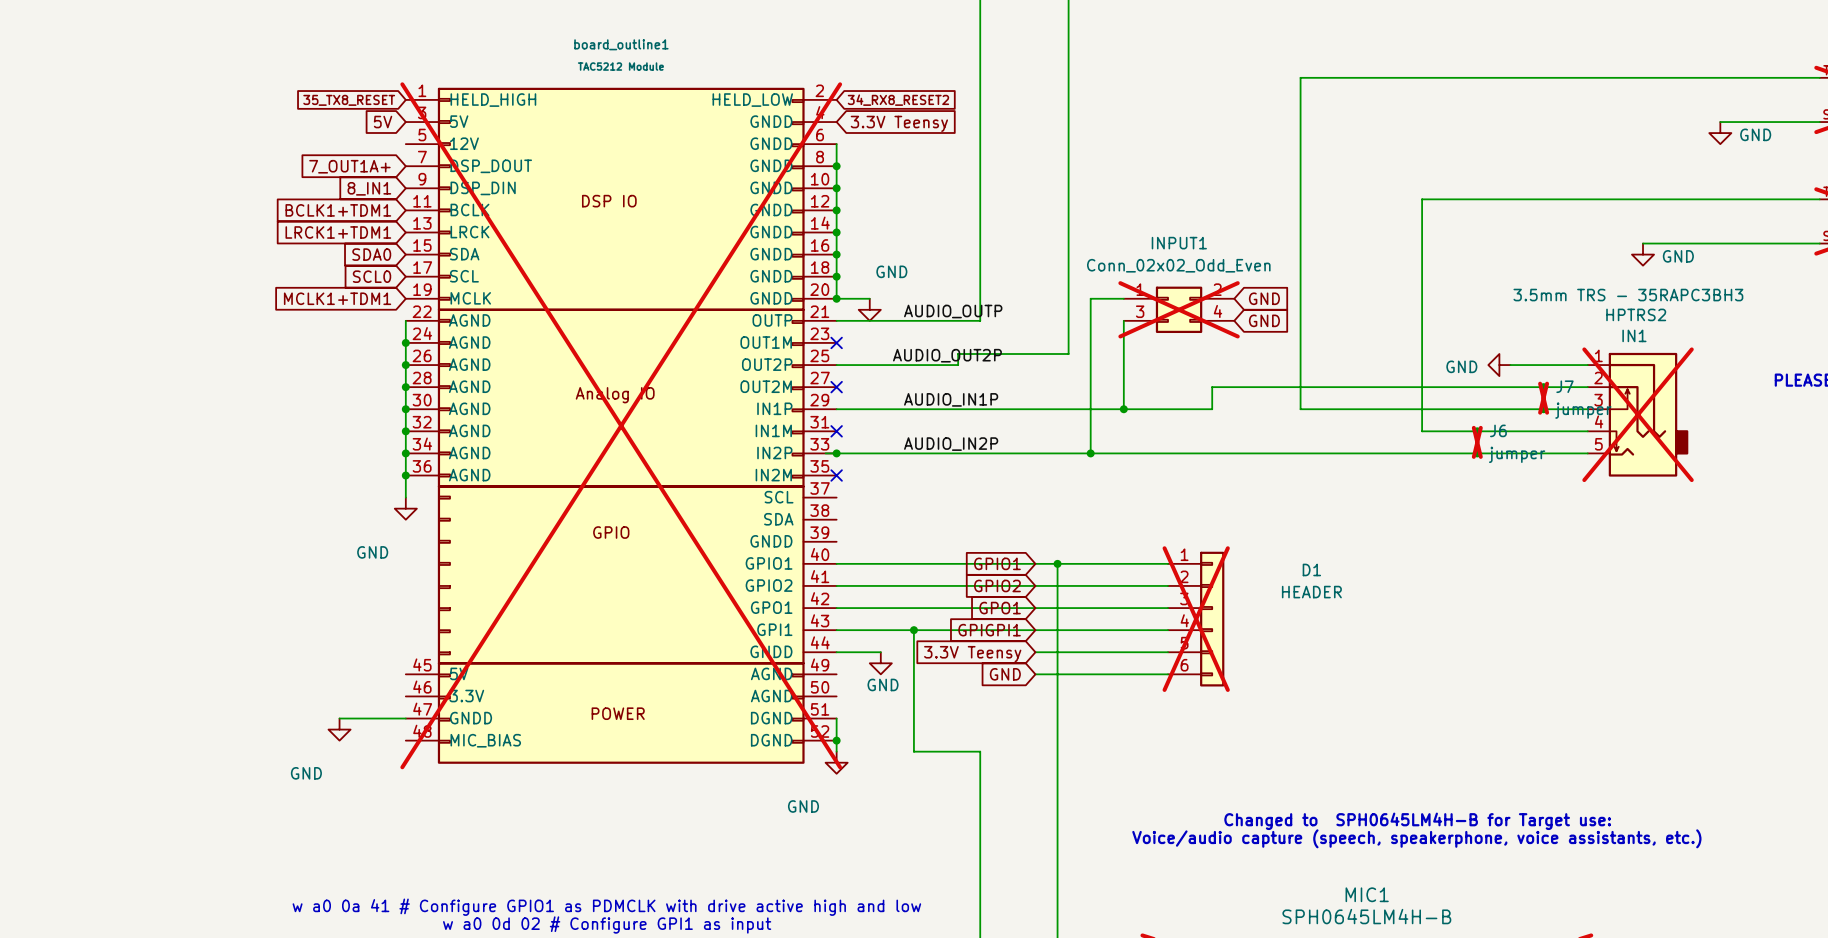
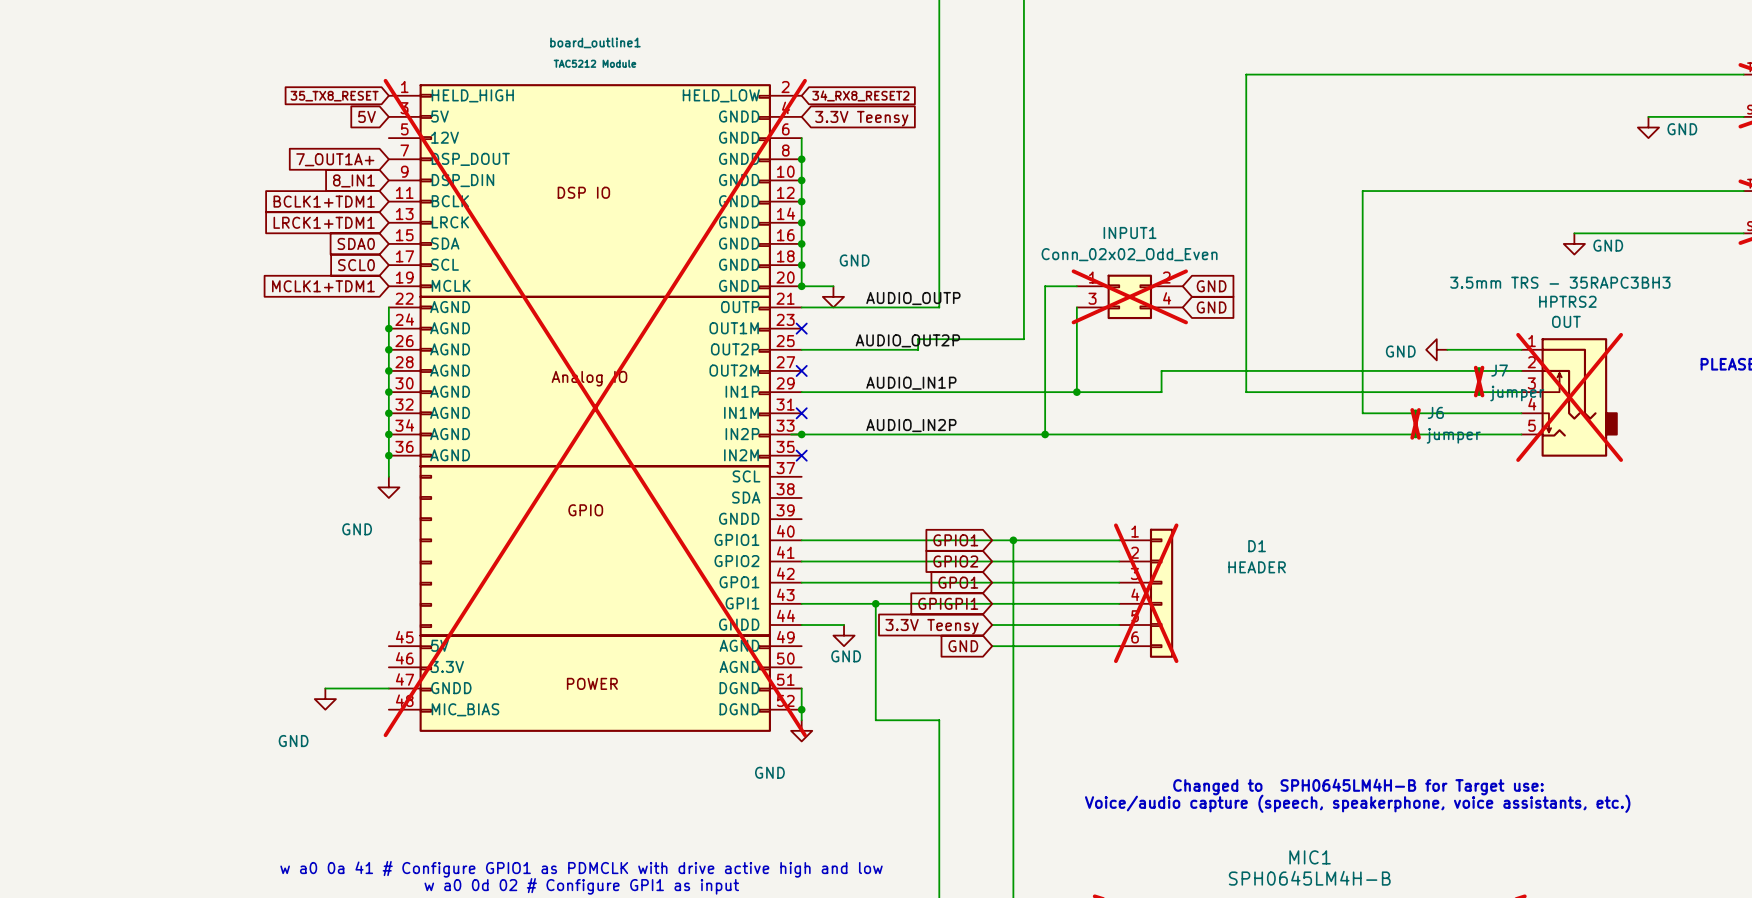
HPTRS2 text: IN1 (1634, 335) -> OUT (1566, 321)

